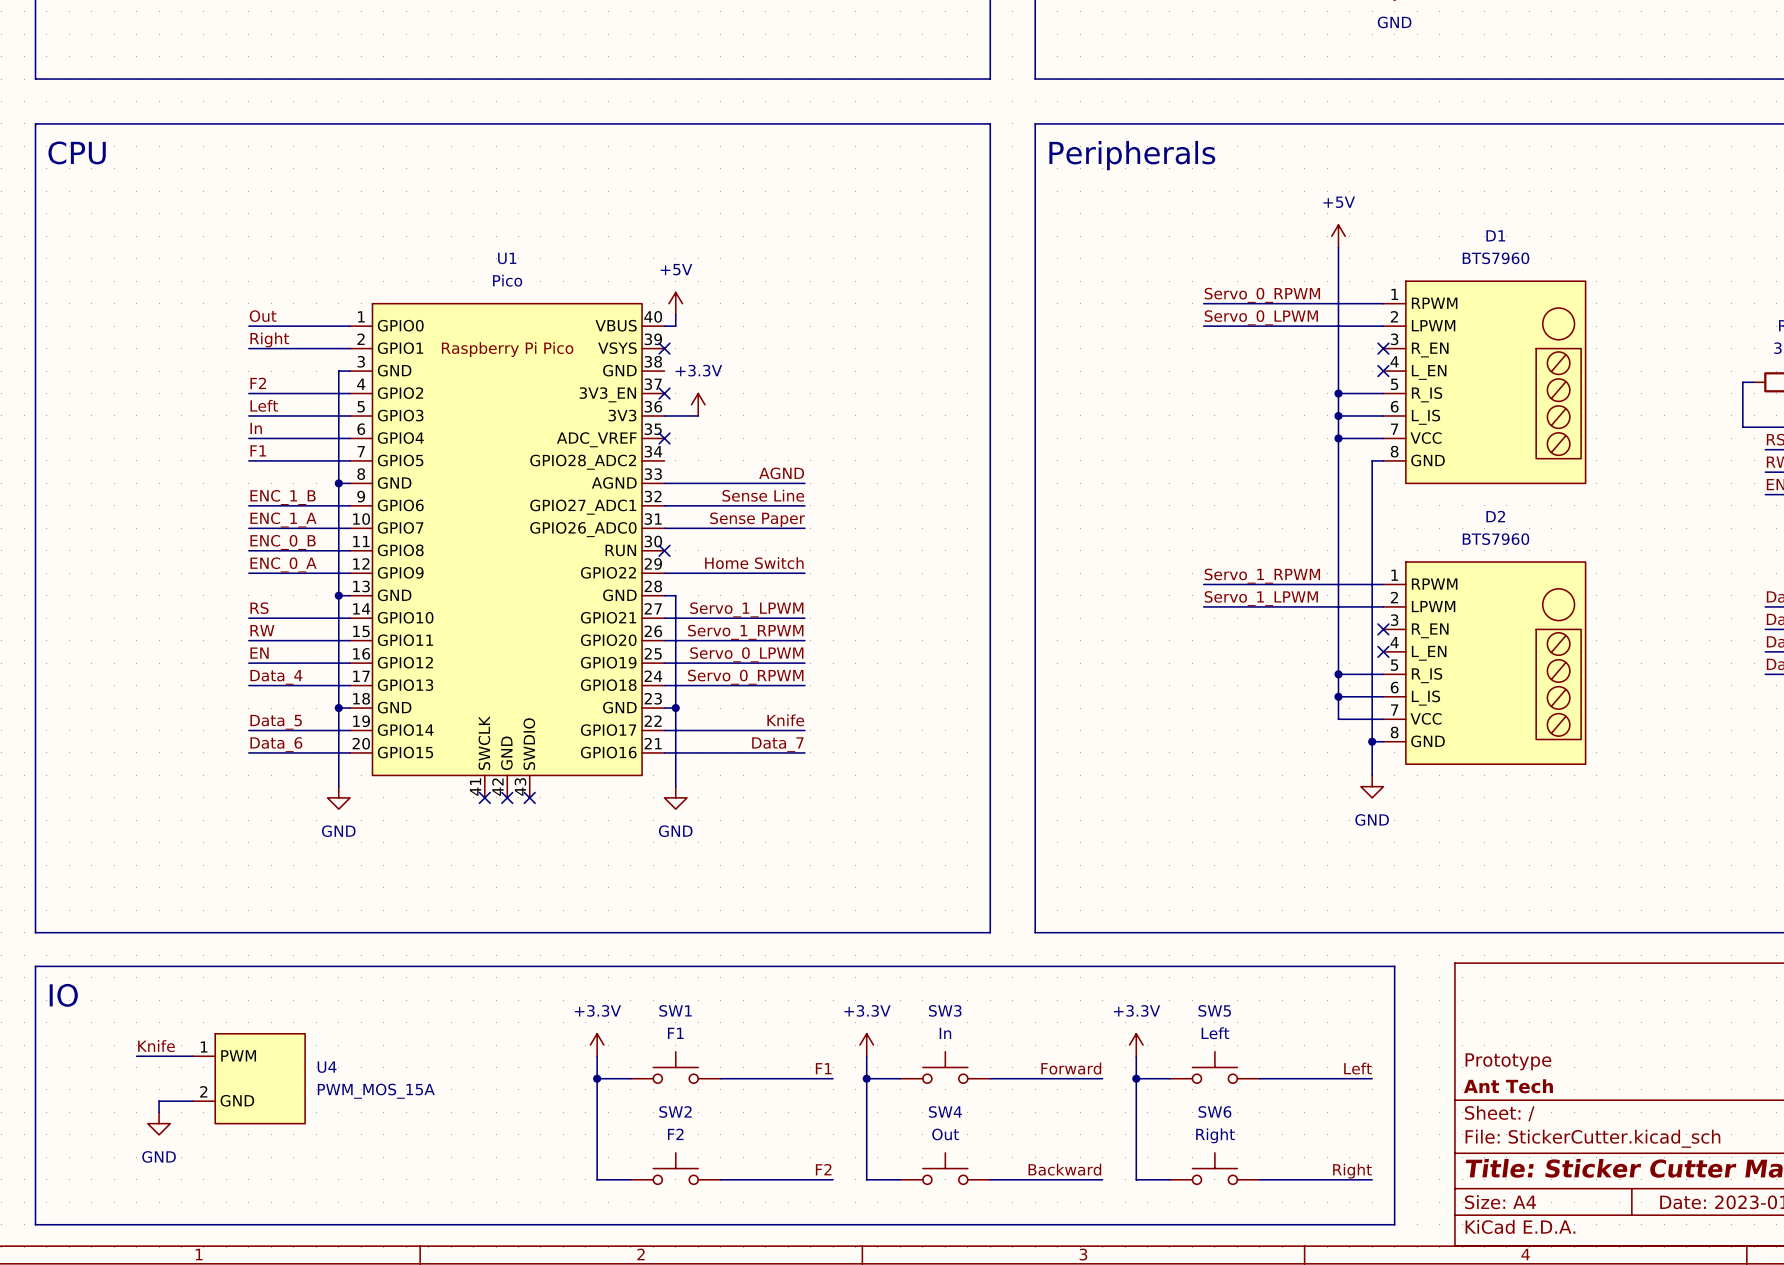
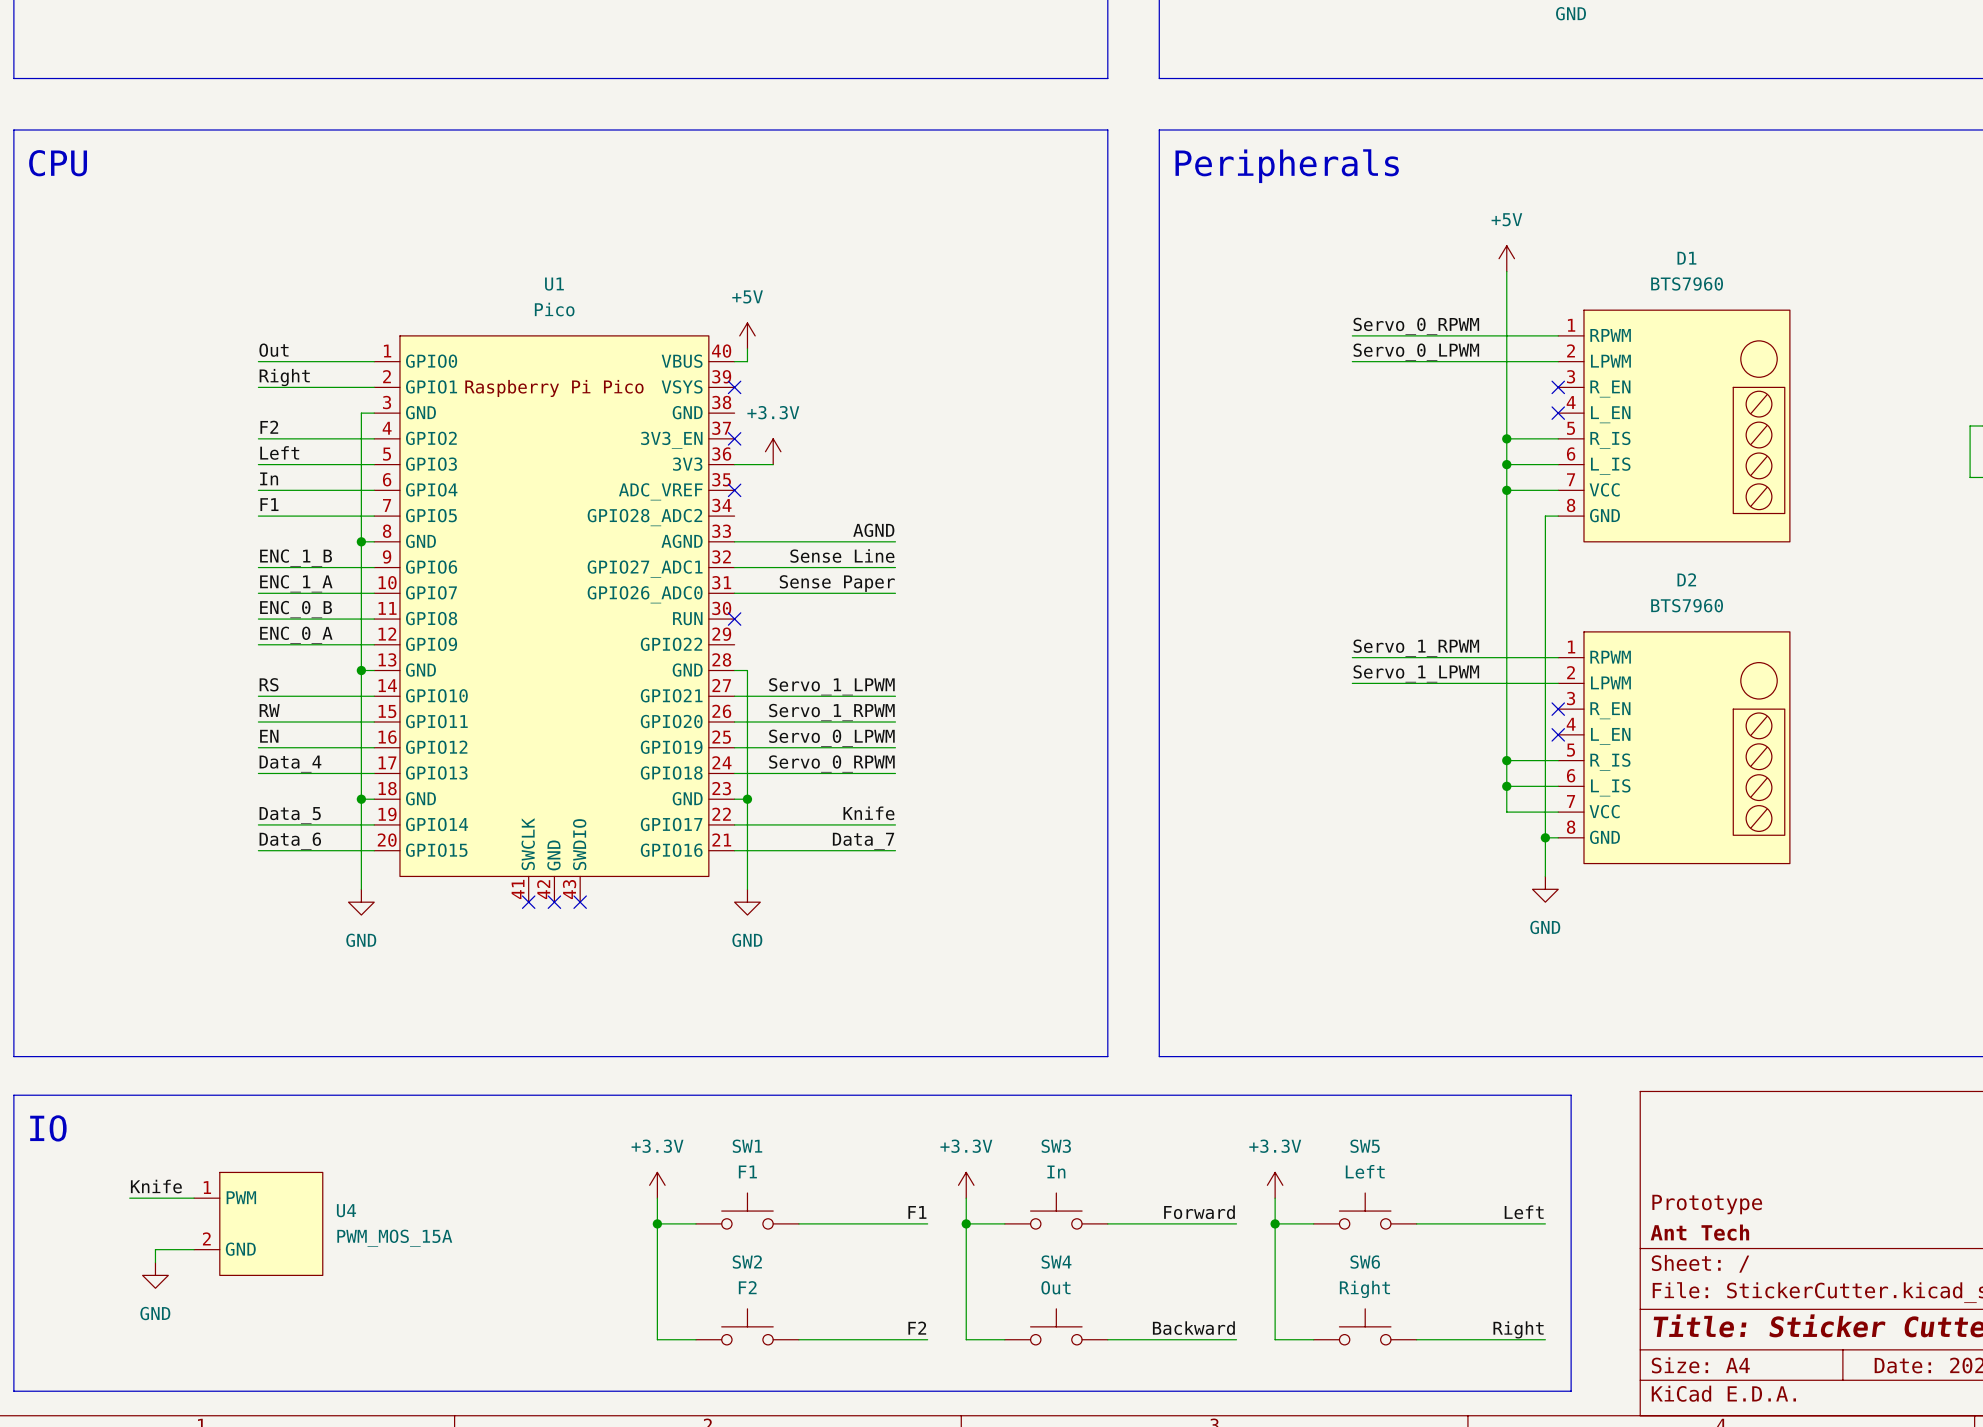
label: Home Switch (754, 563) -> none
wire: (664, 573) (804, 573) -> none

